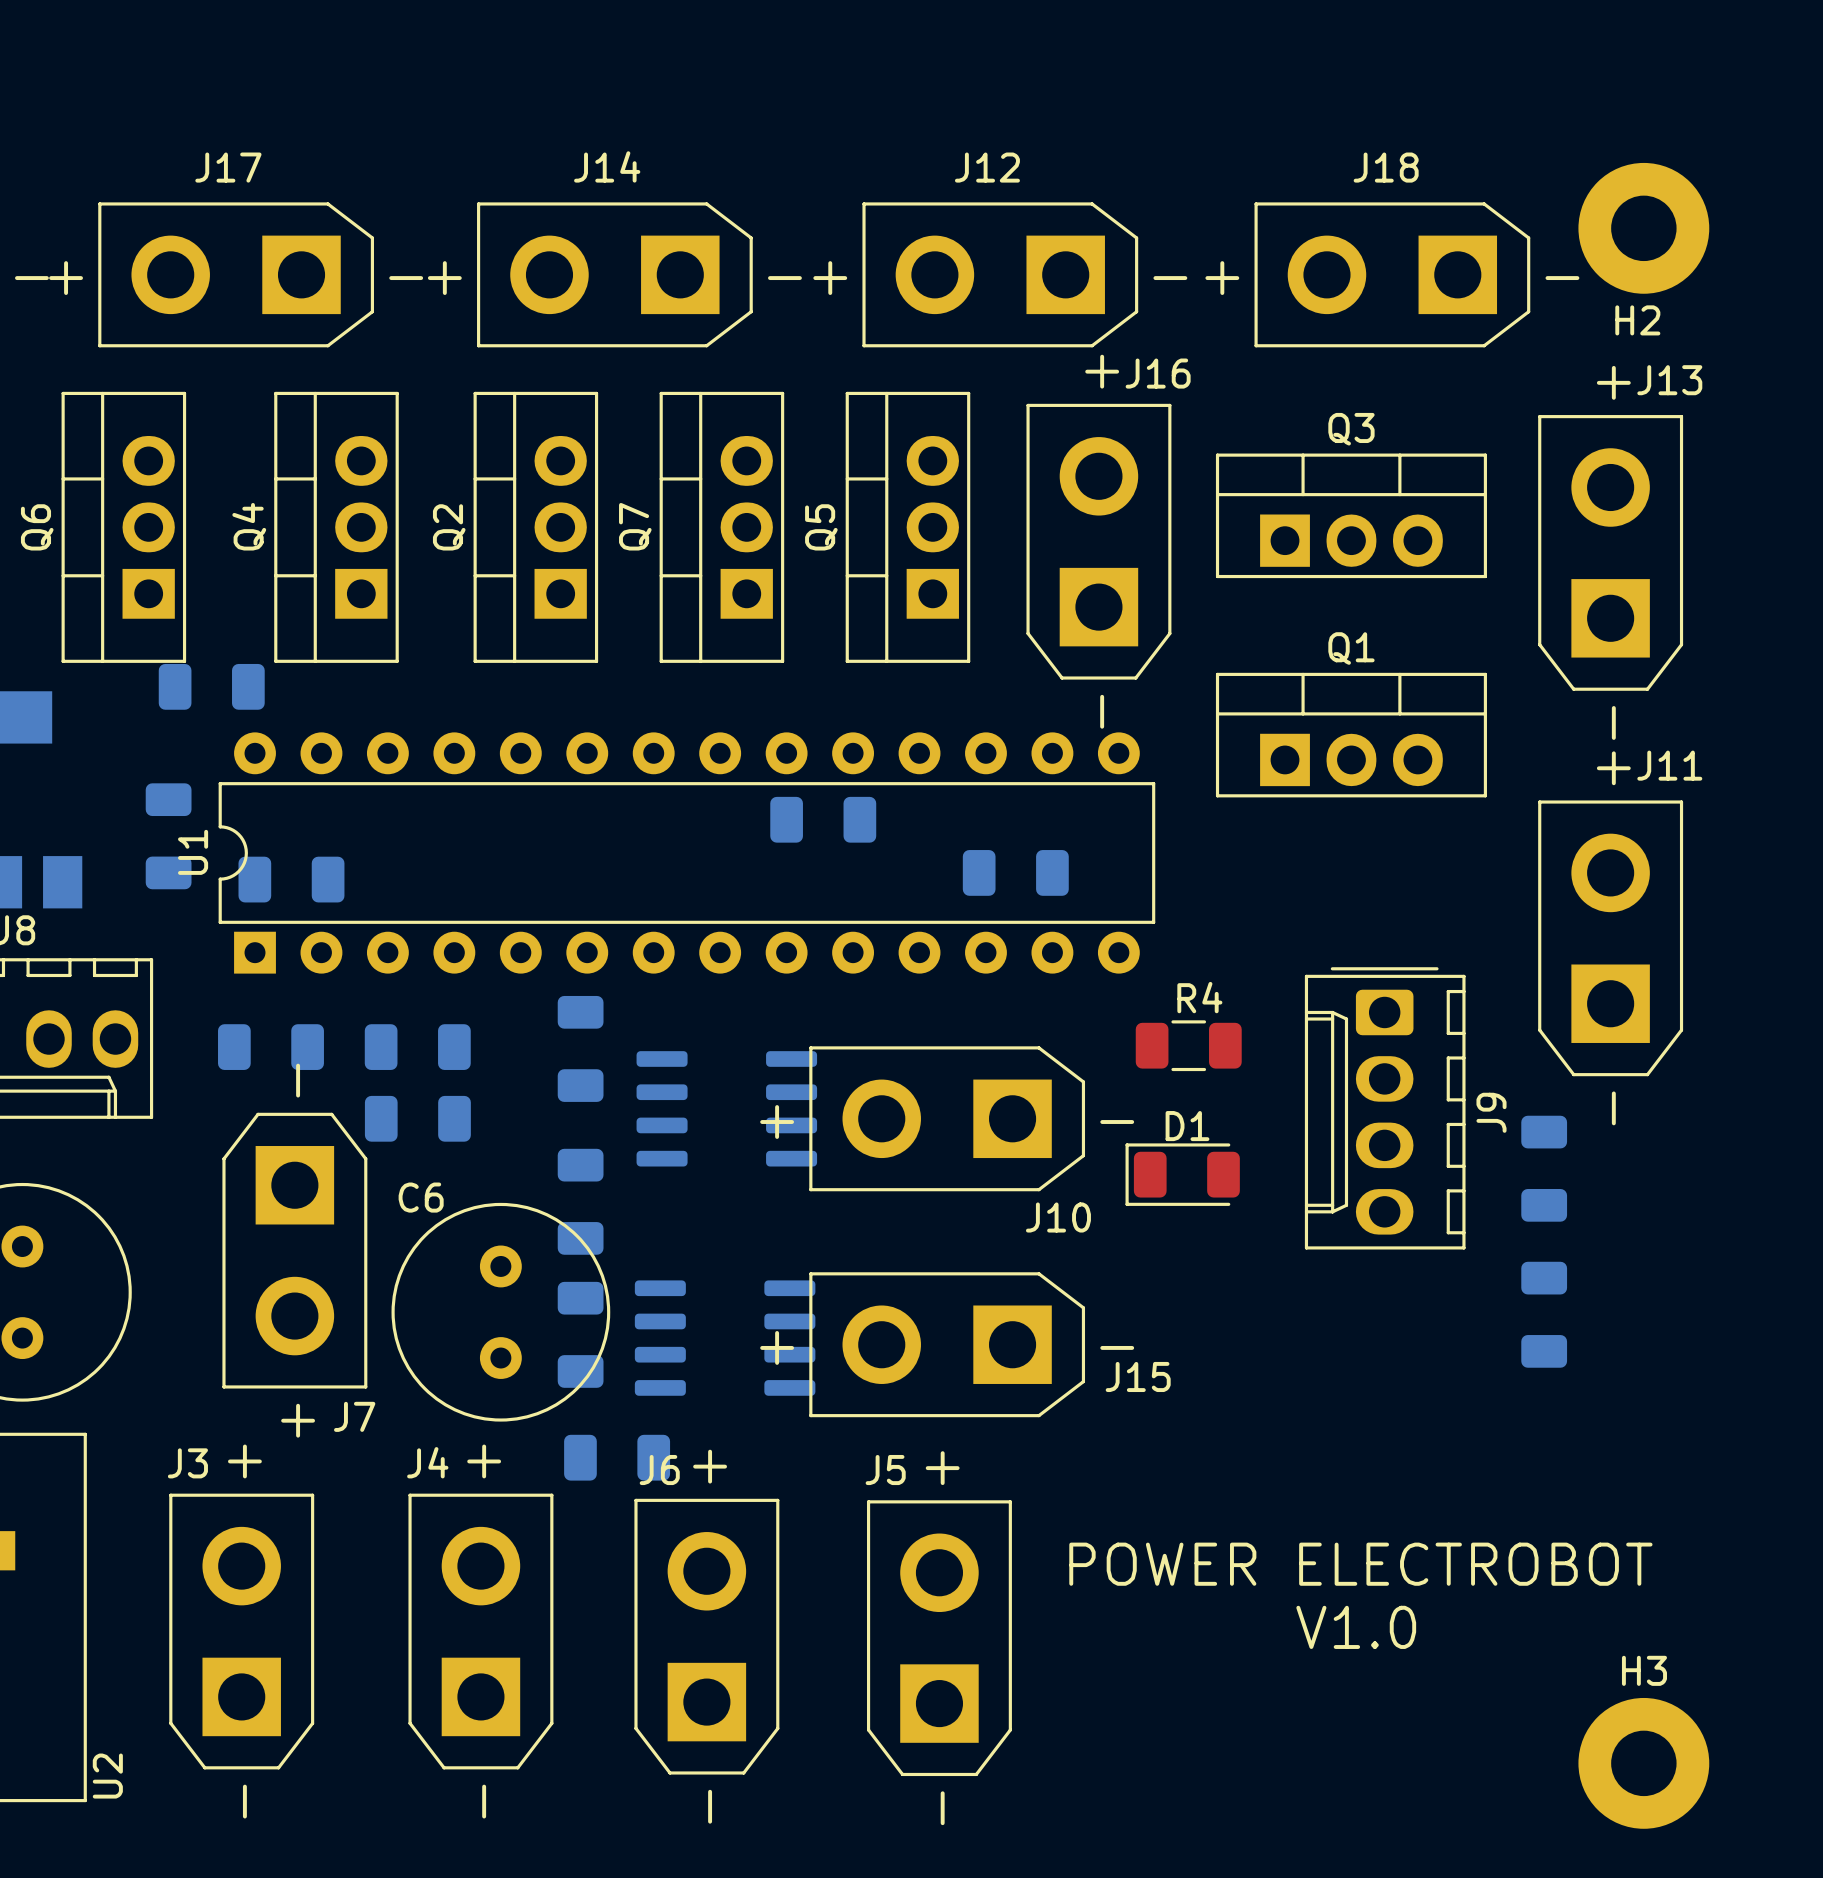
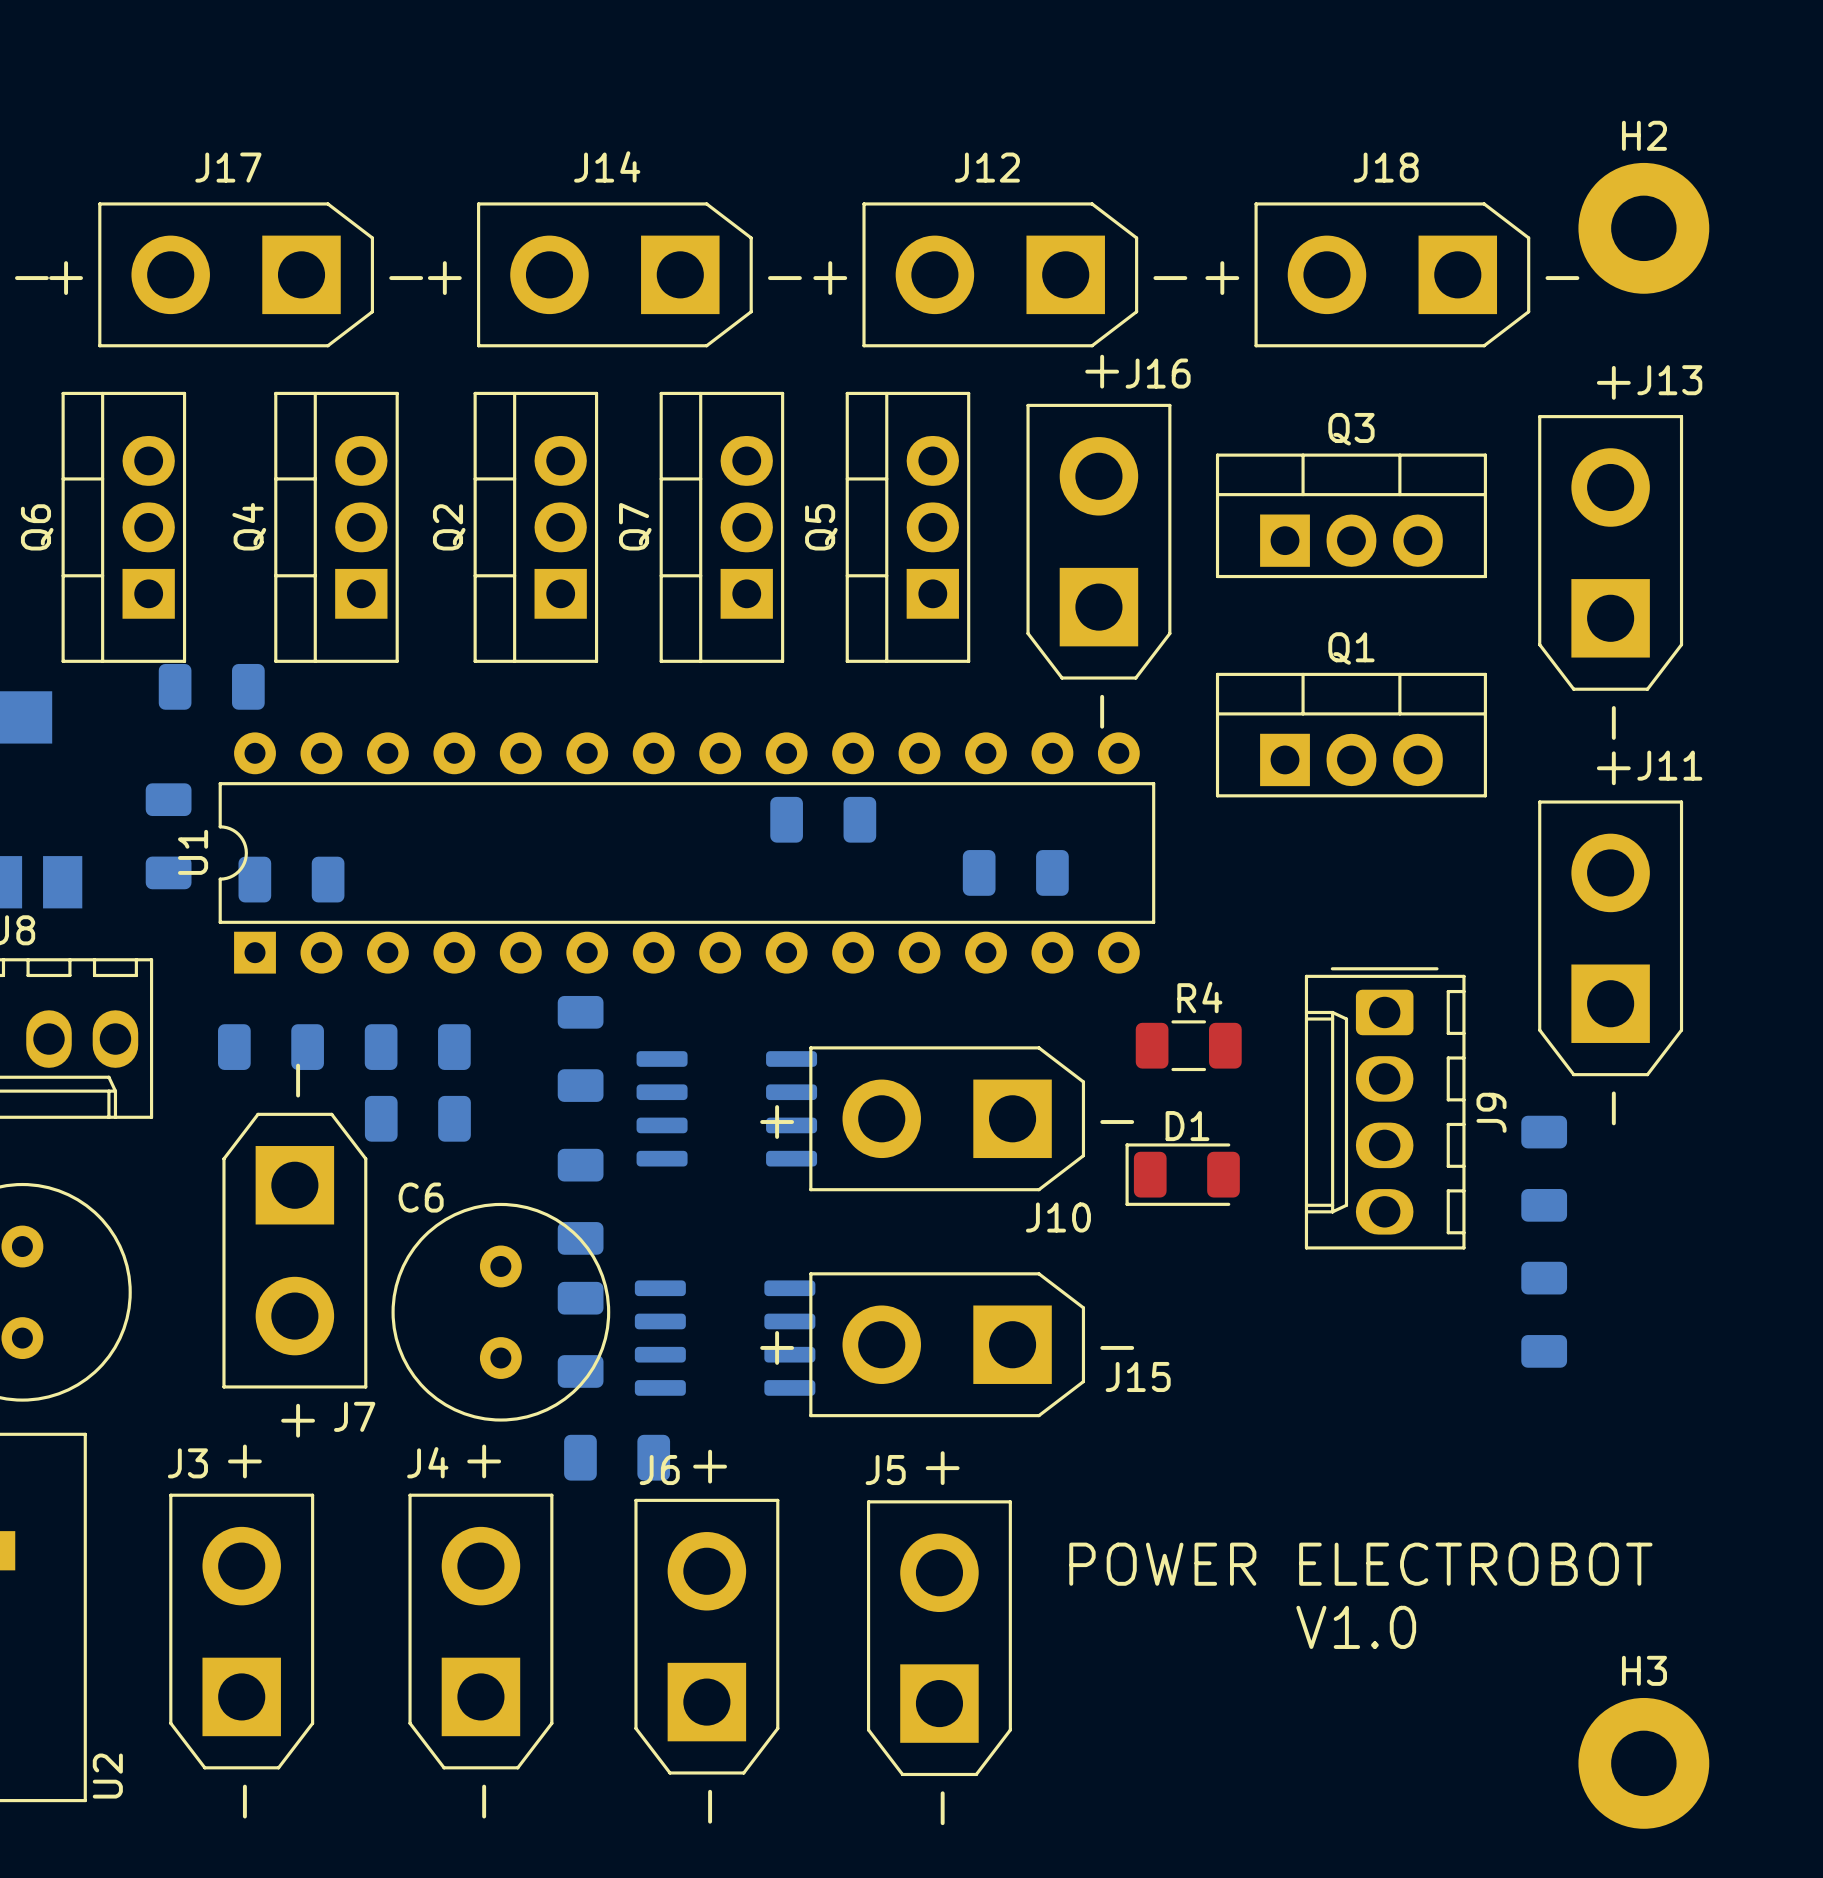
H2 name position: H2 (1637, 320) -> H2 (1644, 135)

